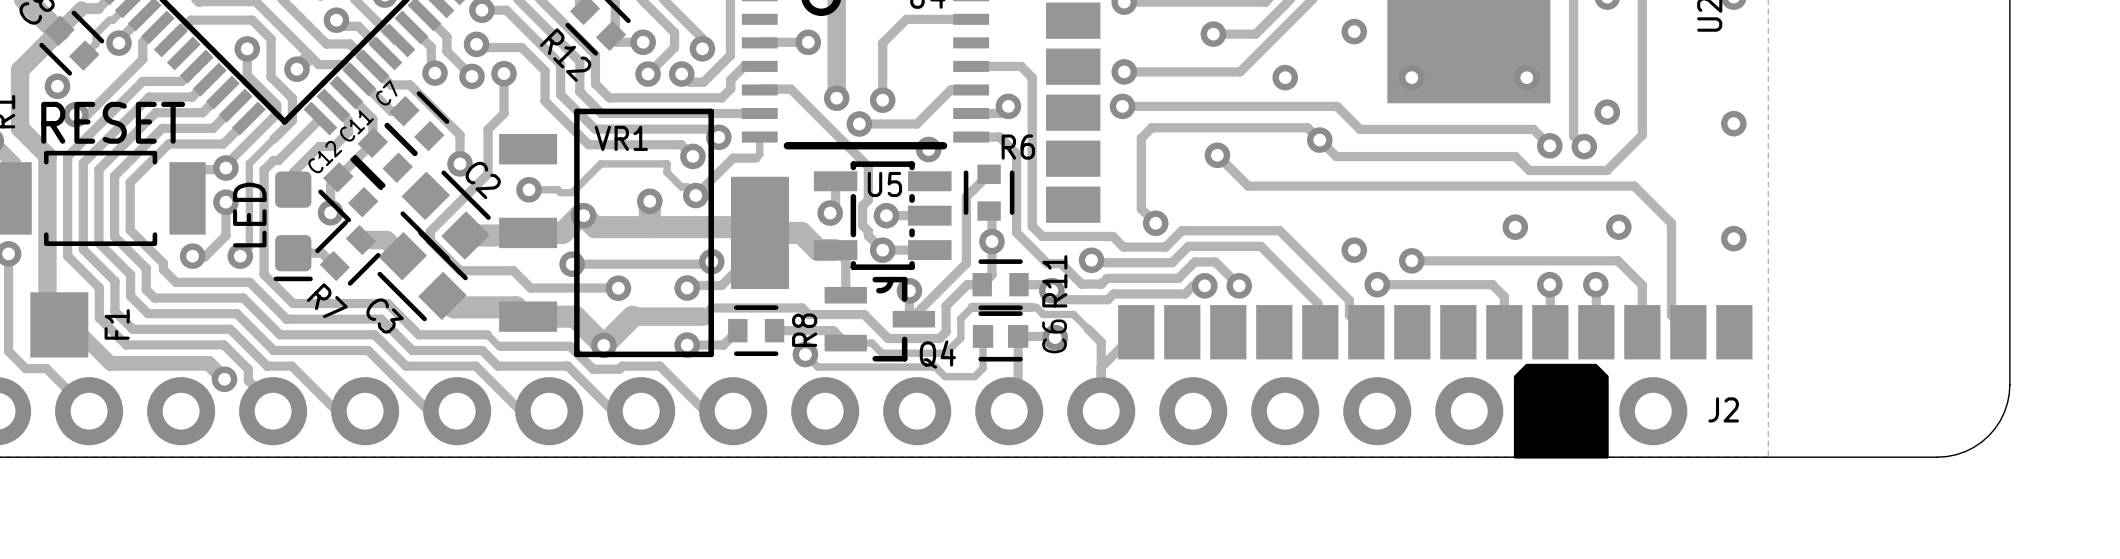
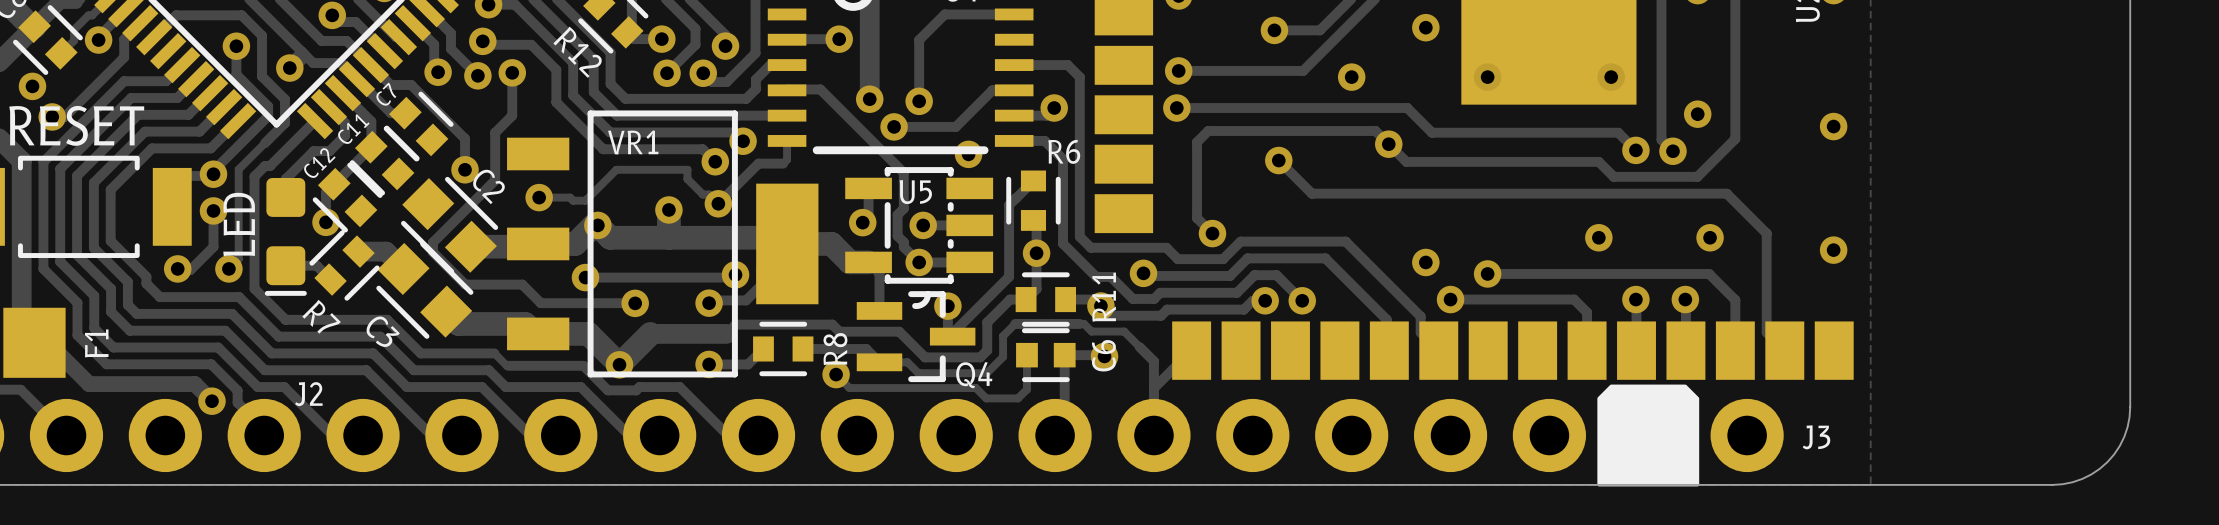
J2 name position: J2 (1723, 409) -> J2 (308, 394)
J3 name: none -> J3 (1816, 437)

